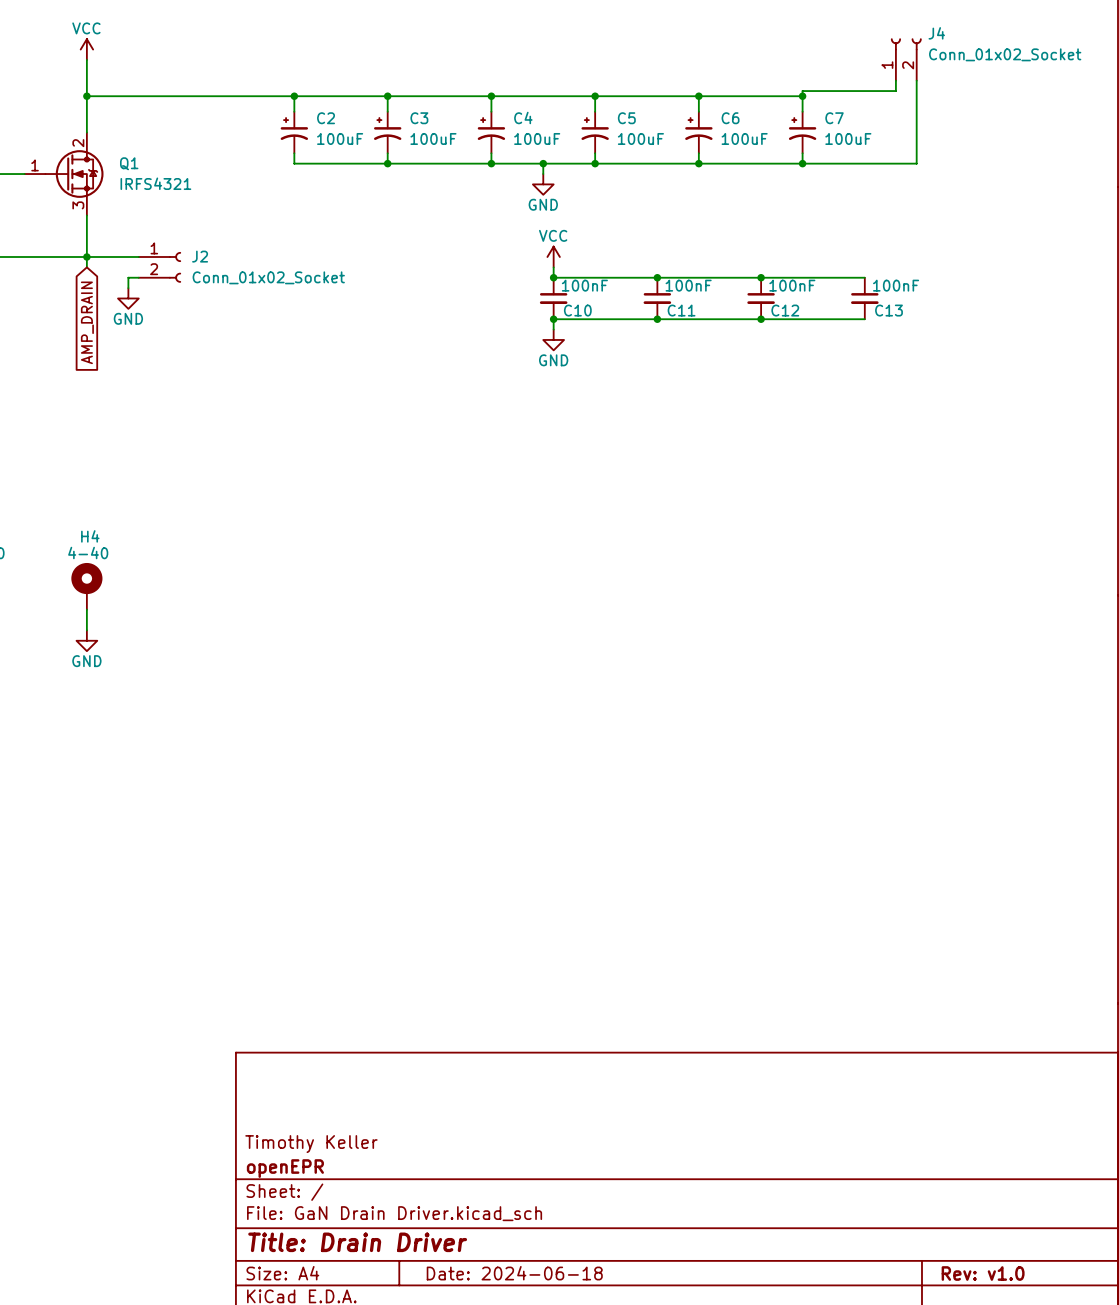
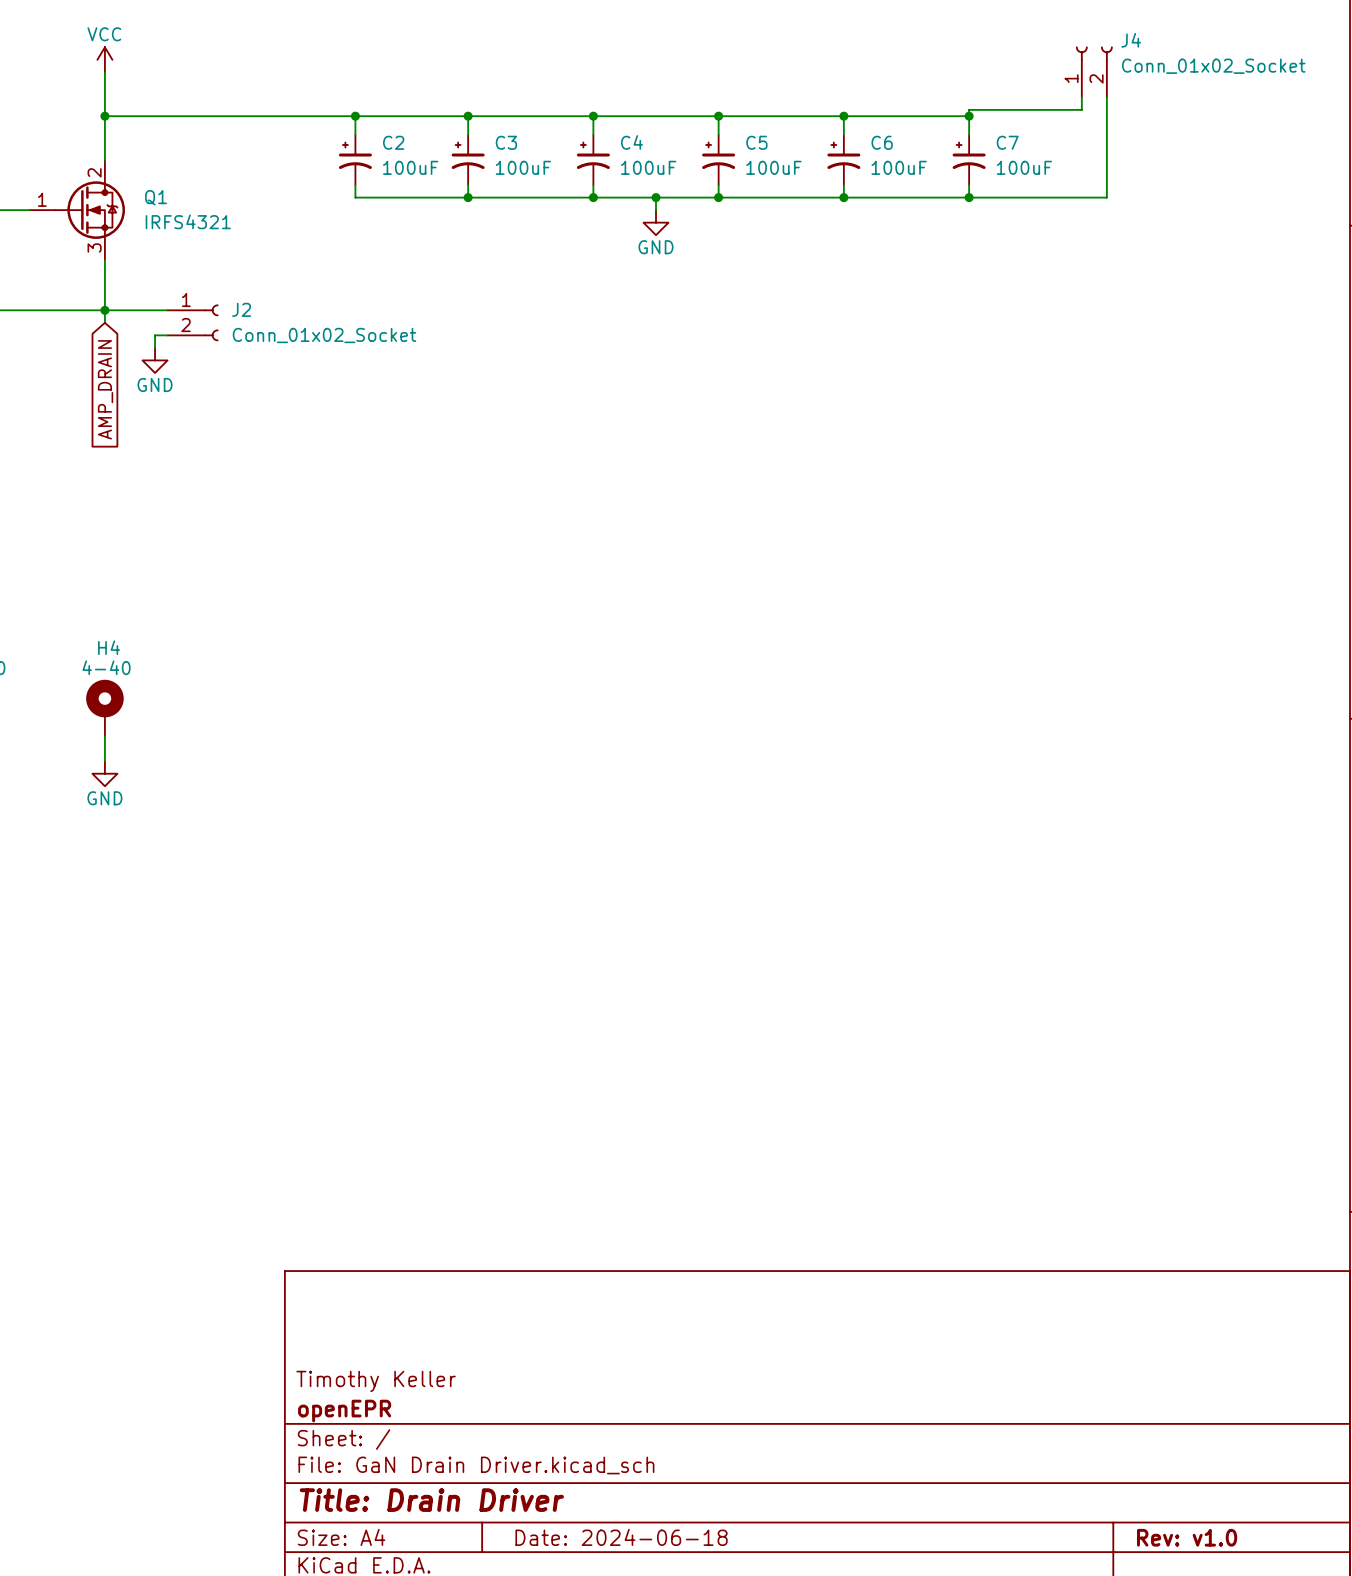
power symbol: VCC (553, 256) -> none
wire: (553, 267) (553, 277) (864, 277) -> none
junction: (553, 277) -> none
junction: (657, 277) -> none
junction: (761, 277) -> none
C10: 100nF (553, 298) -> none
C11: 100nF (657, 298) -> none
C12: 100nF (761, 298) -> none
C13: 100nF (864, 298) -> none
junction: (553, 319) -> none
junction: (657, 319) -> none
junction: (761, 319) -> none
wire: (864, 319) (553, 319) (553, 329) -> none
power symbol: GND (553, 339) -> none

